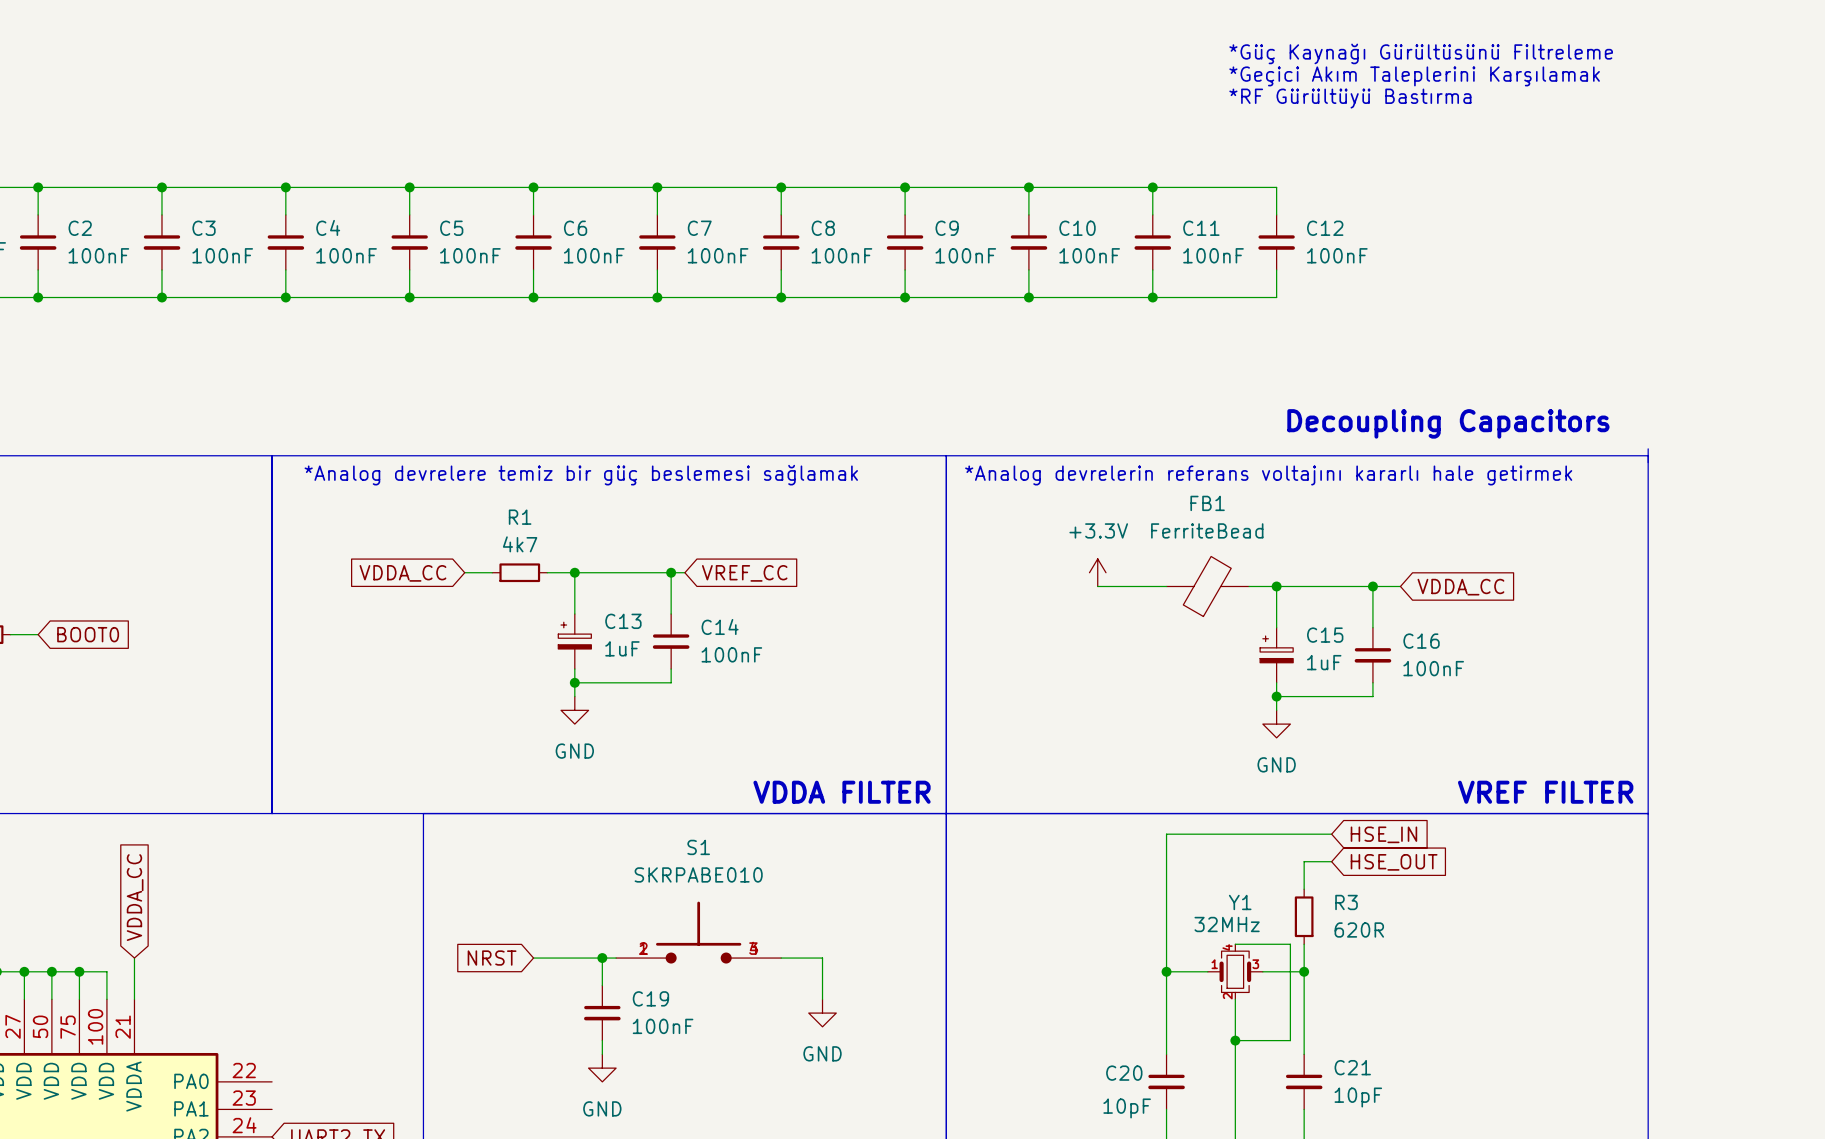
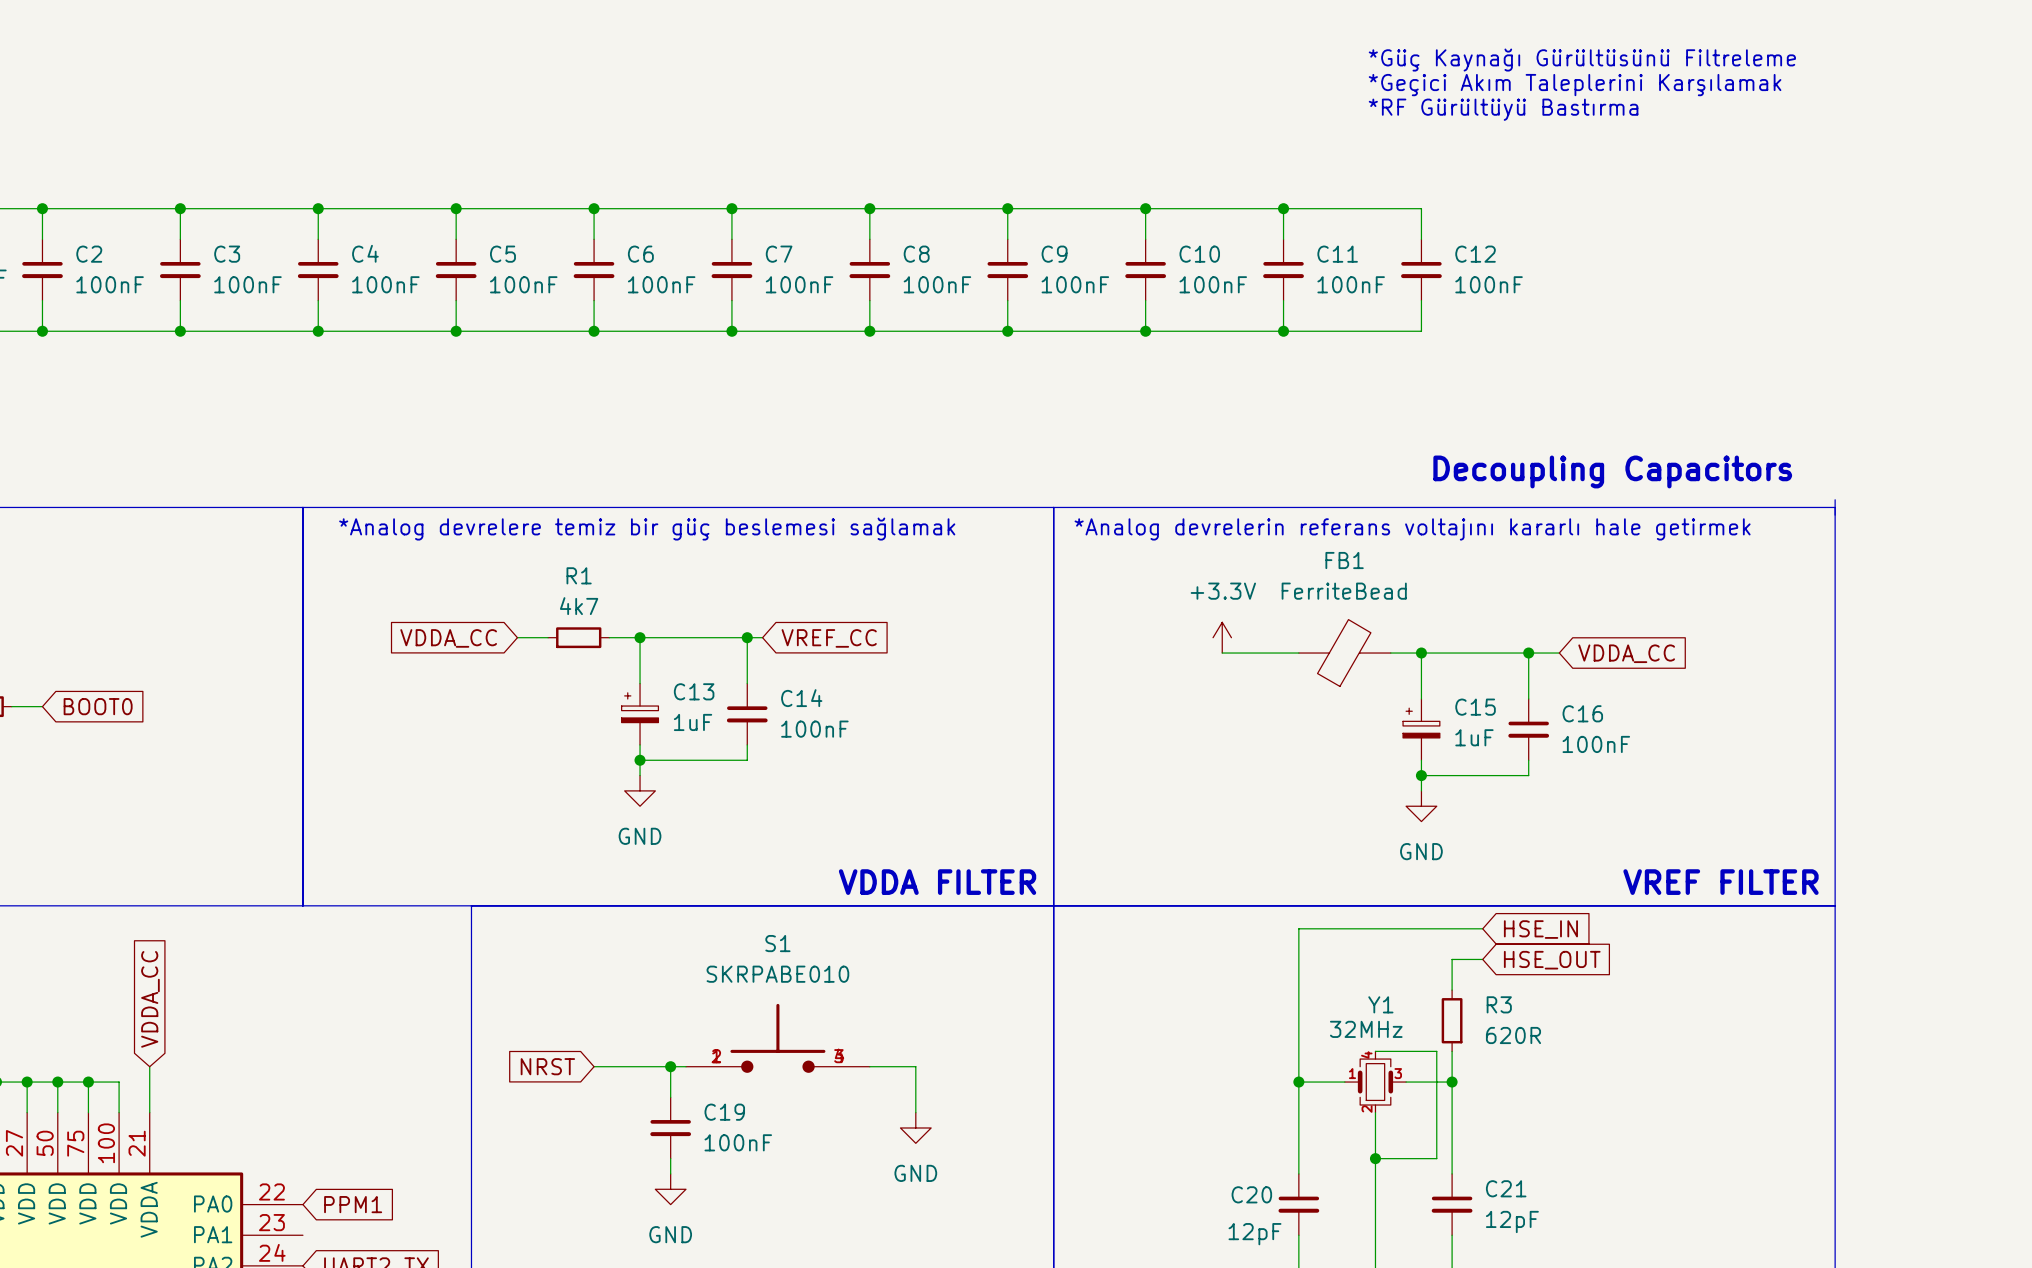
global label: none -> PPM1 (353, 1204)
C21 value: 10pF (1358, 1097) -> 12pF (1512, 1221)
C20 value: 10pF (1127, 1108) -> 12pF (1254, 1234)

